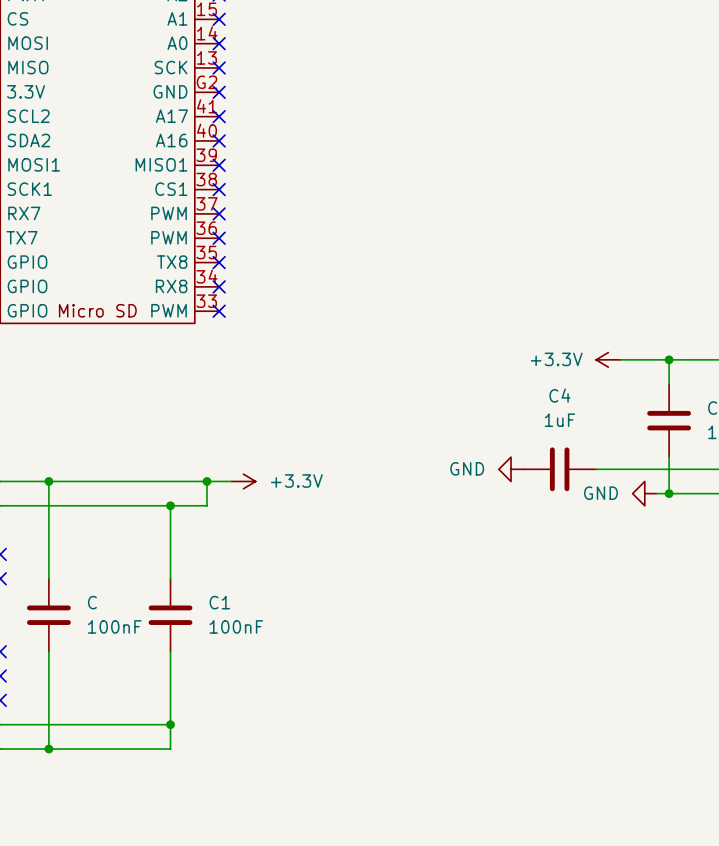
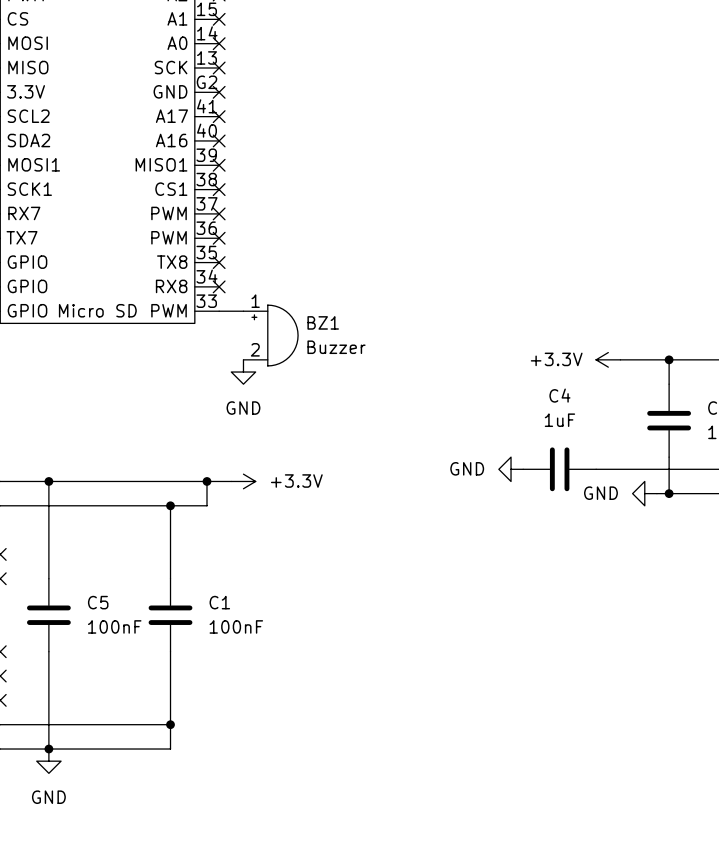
wire: none -> (219, 311) (243, 311)
no-connect mark: (219, 311) -> none
BZ1: none -> Buzzer (270, 335)
power symbol: none -> GND (243, 372)
C name: C (92, 602) -> C5 (98, 602)
power symbol: none -> GND (48, 761)

